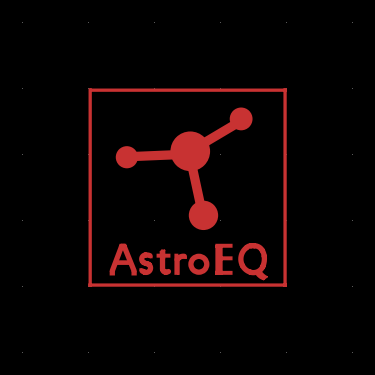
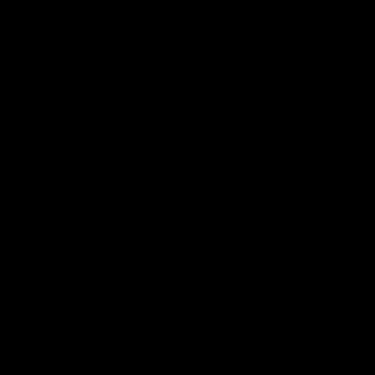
part: (187, 187) -> none

